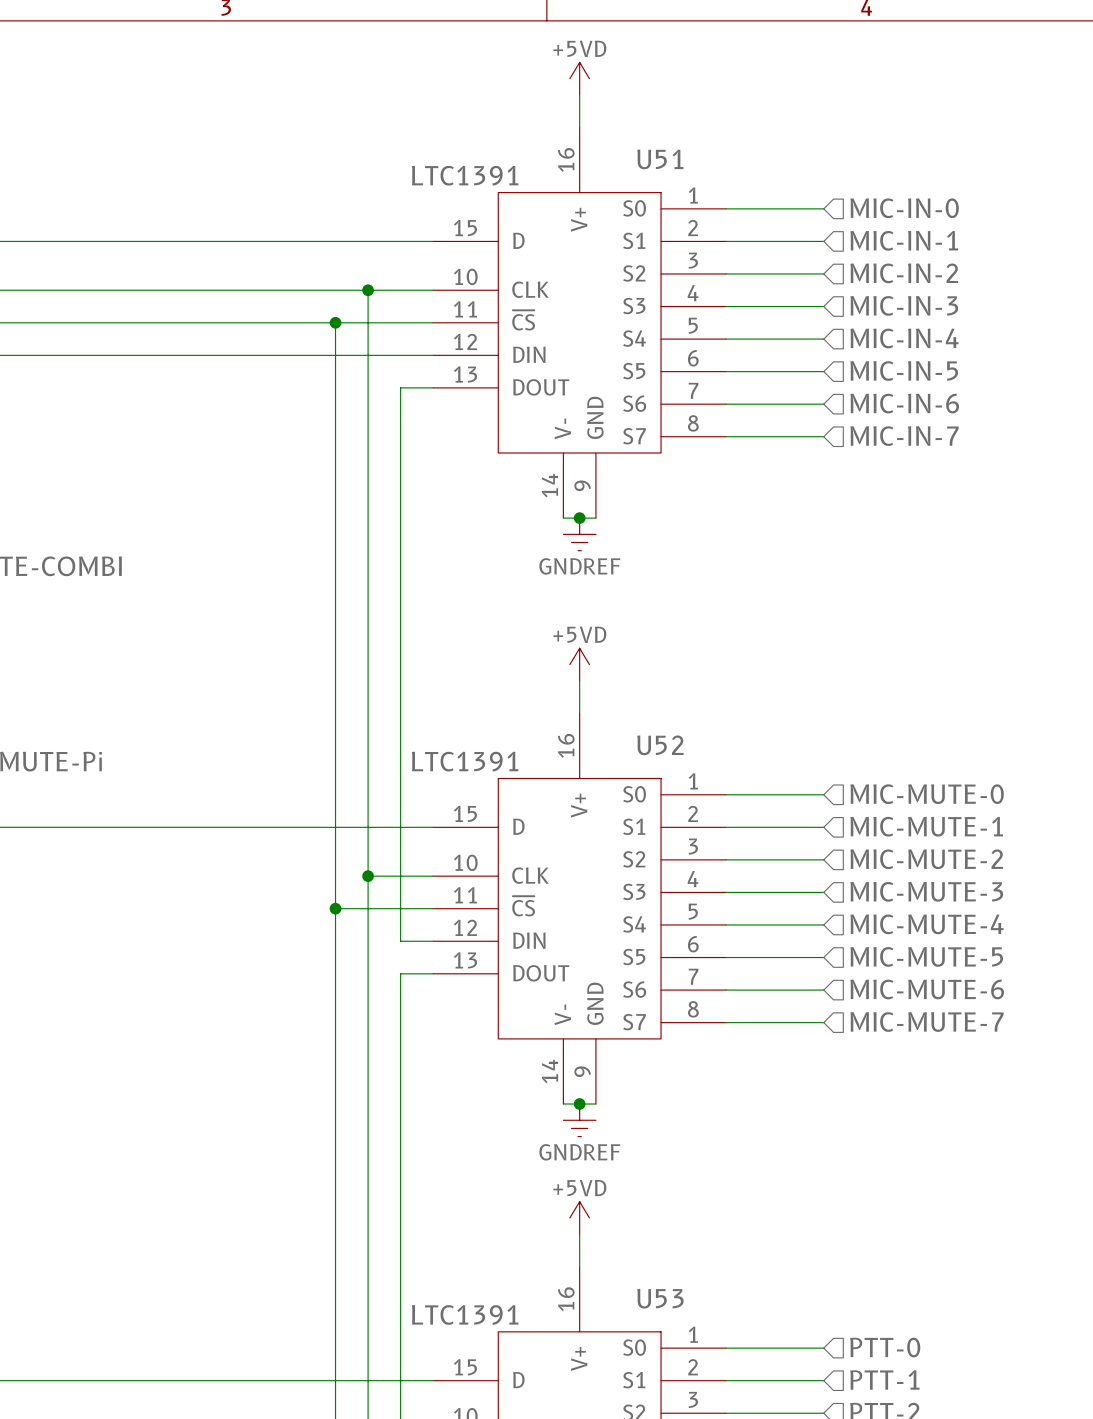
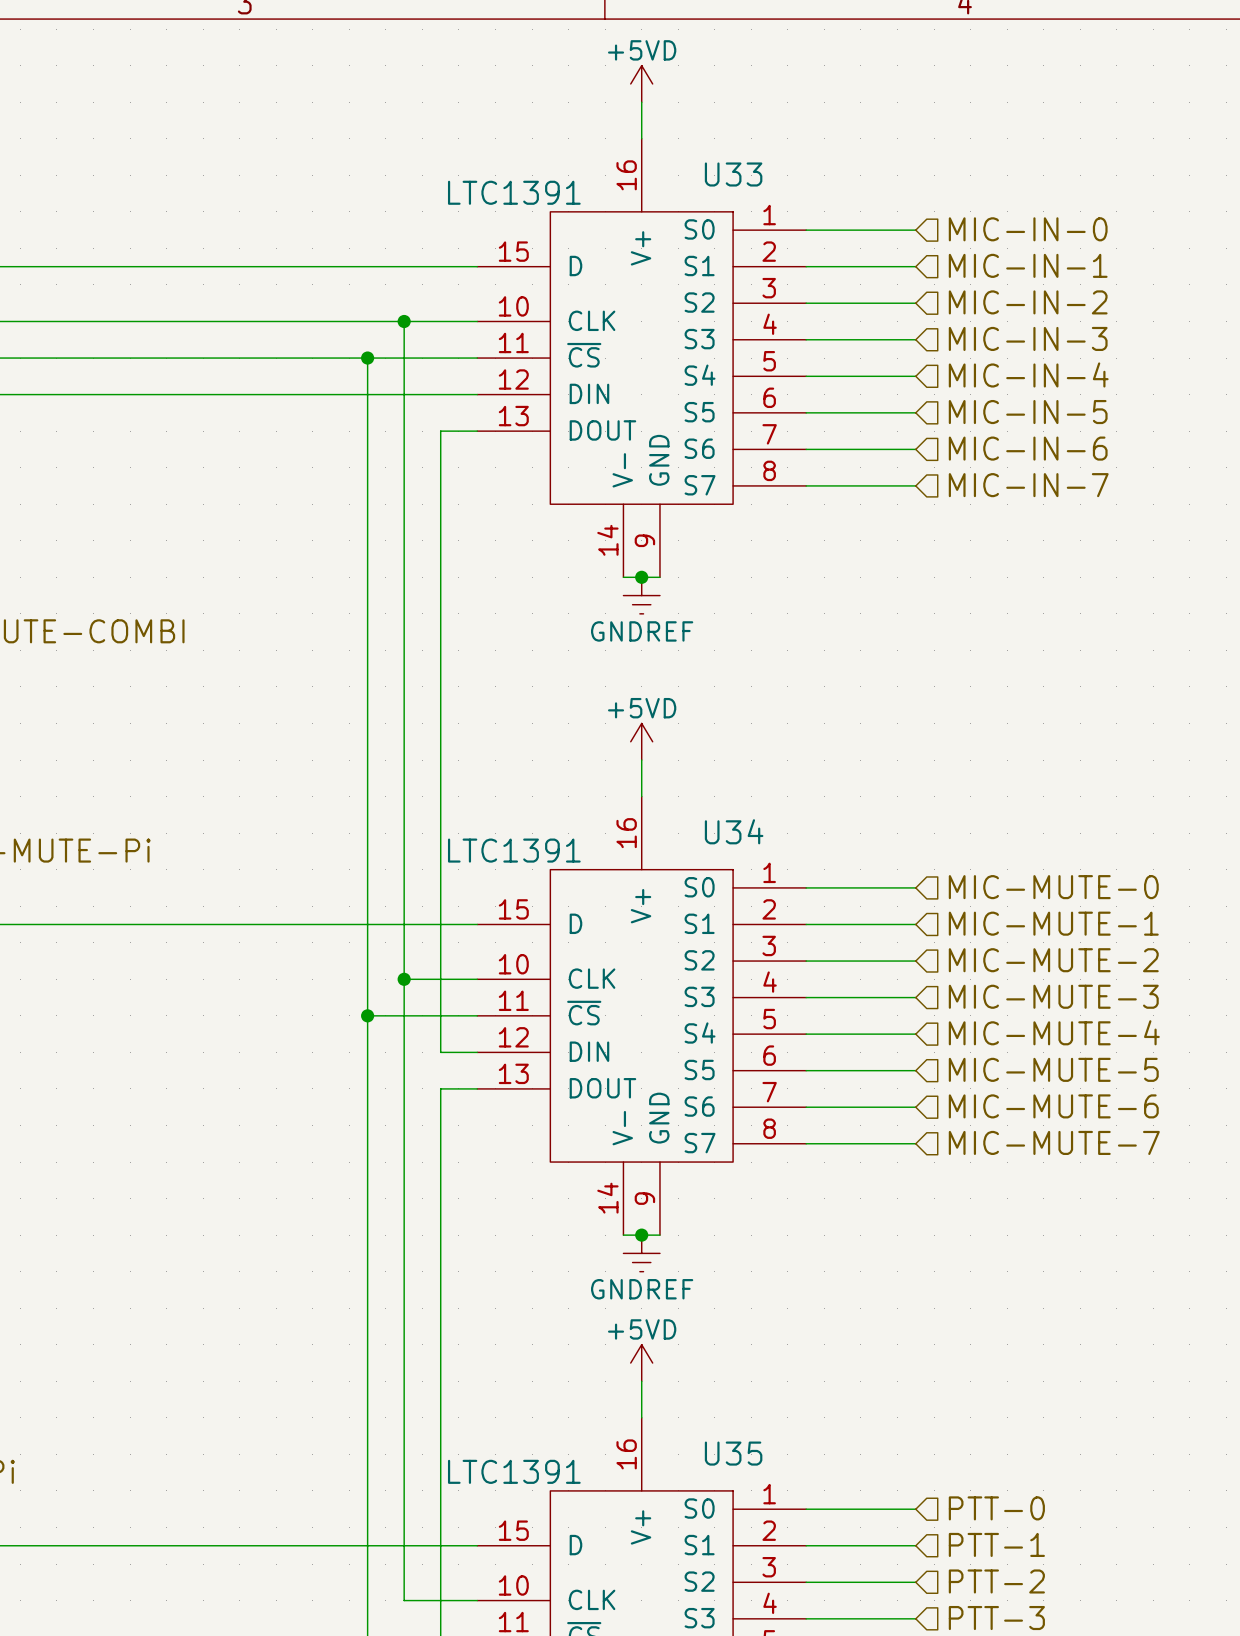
U51 name: U51 (660, 159) -> U33 (733, 174)
U52 name: U52 (660, 745) -> U34 (734, 831)
U53 name: U53 (660, 1298) -> U35 (733, 1453)

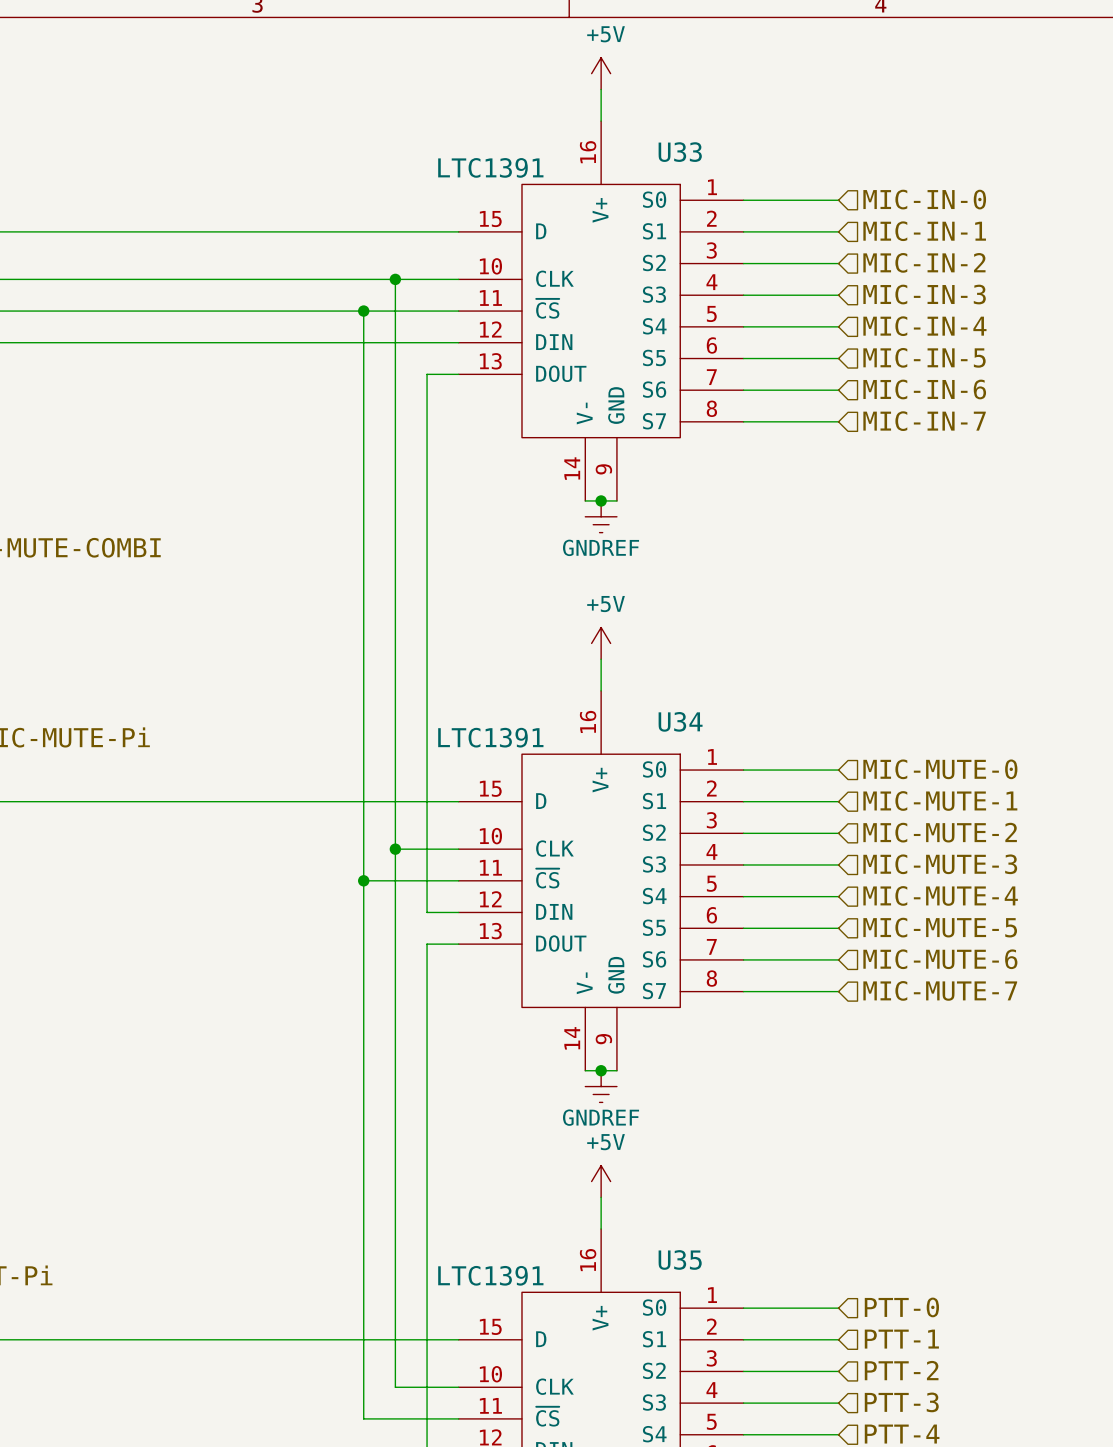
power symbol: +5VD (641, 83) -> +5V (601, 73)
power symbol: +5VD (641, 741) -> +5V (601, 643)
power symbol: +5VD (641, 1363) -> +5V (601, 1181)

